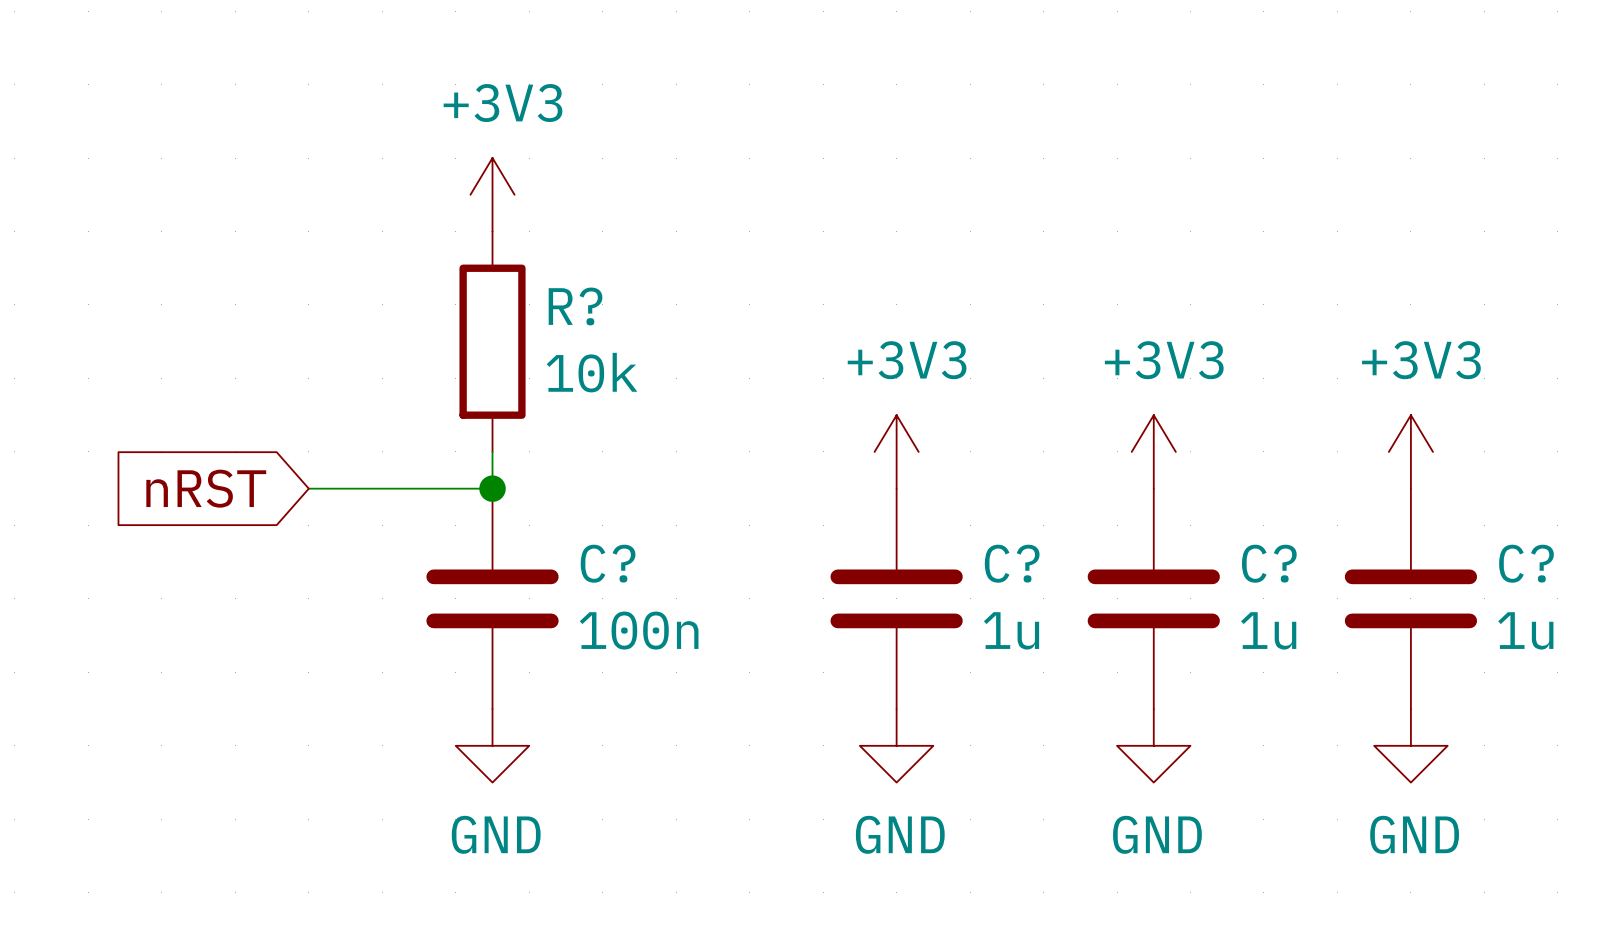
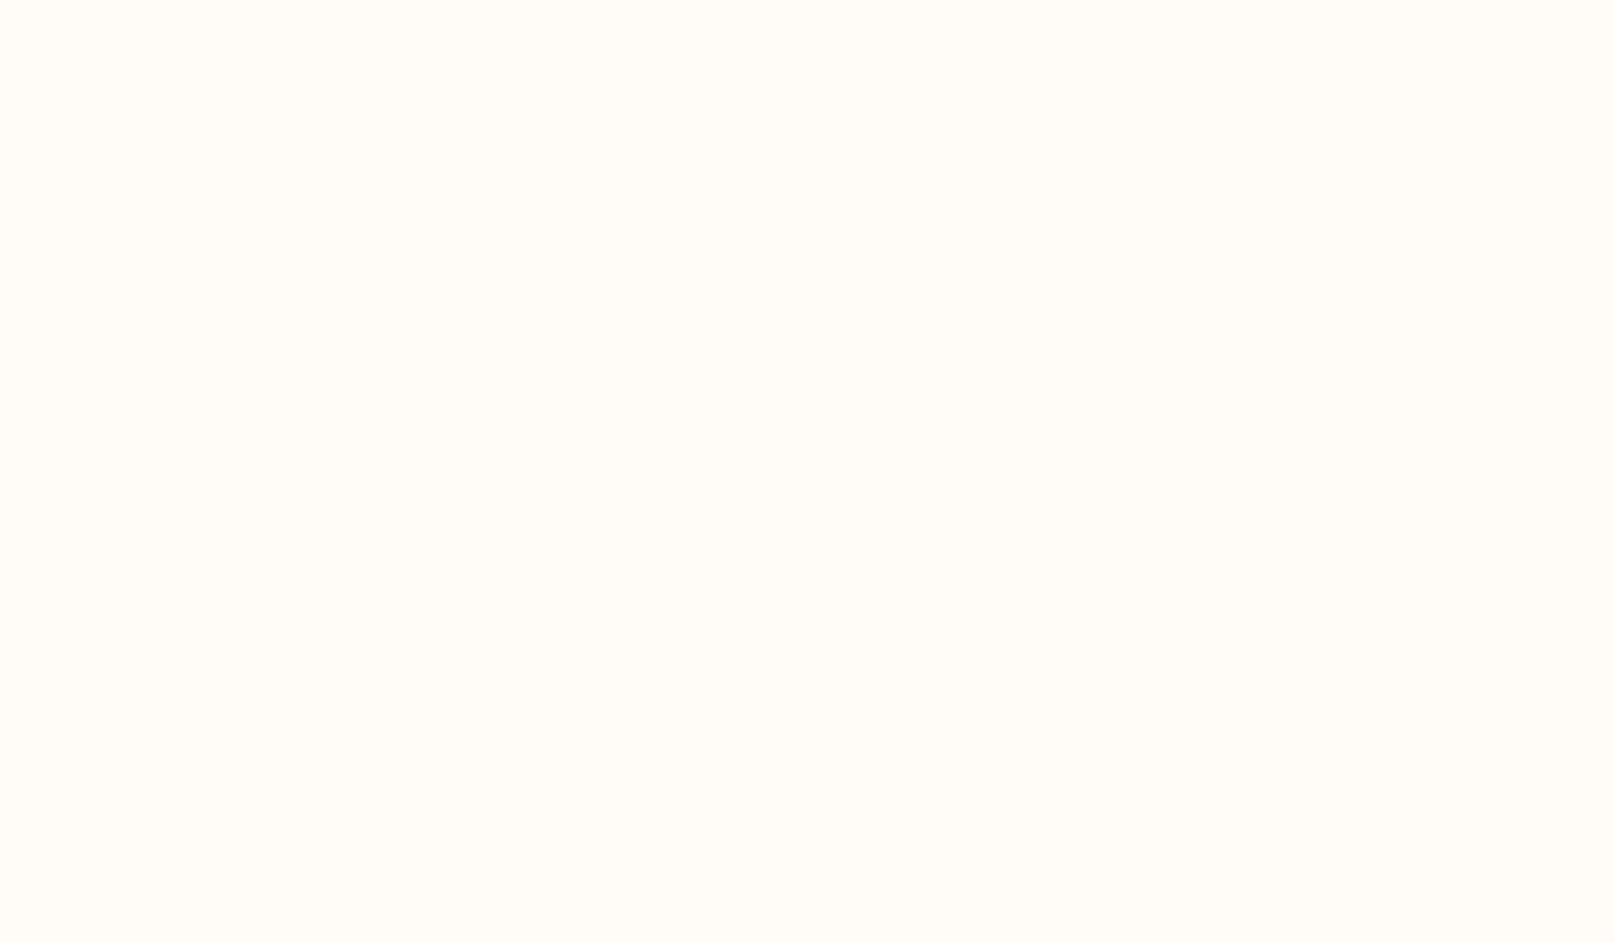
power symbol: +3V3 (492, 194) -> none
R?: 10k (492, 341) -> none
wire: (492, 451) (492, 488) (308, 488) -> none
power symbol: +3V3 (896, 451) -> none
power symbol: +3V3 (1153, 451) -> none
power symbol: +3V3 (1410, 451) -> none
global label: nRST (206, 488) -> none
junction: (492, 488) -> none
C?: 100n (492, 598) -> none
C?: 1u (896, 598) -> none
C?: 1u (1153, 598) -> none
C?: 1u (1410, 598) -> none
power symbol: GND (492, 745) -> none
power symbol: GND (896, 745) -> none
power symbol: GND (1153, 745) -> none
power symbol: GND (1410, 745) -> none

